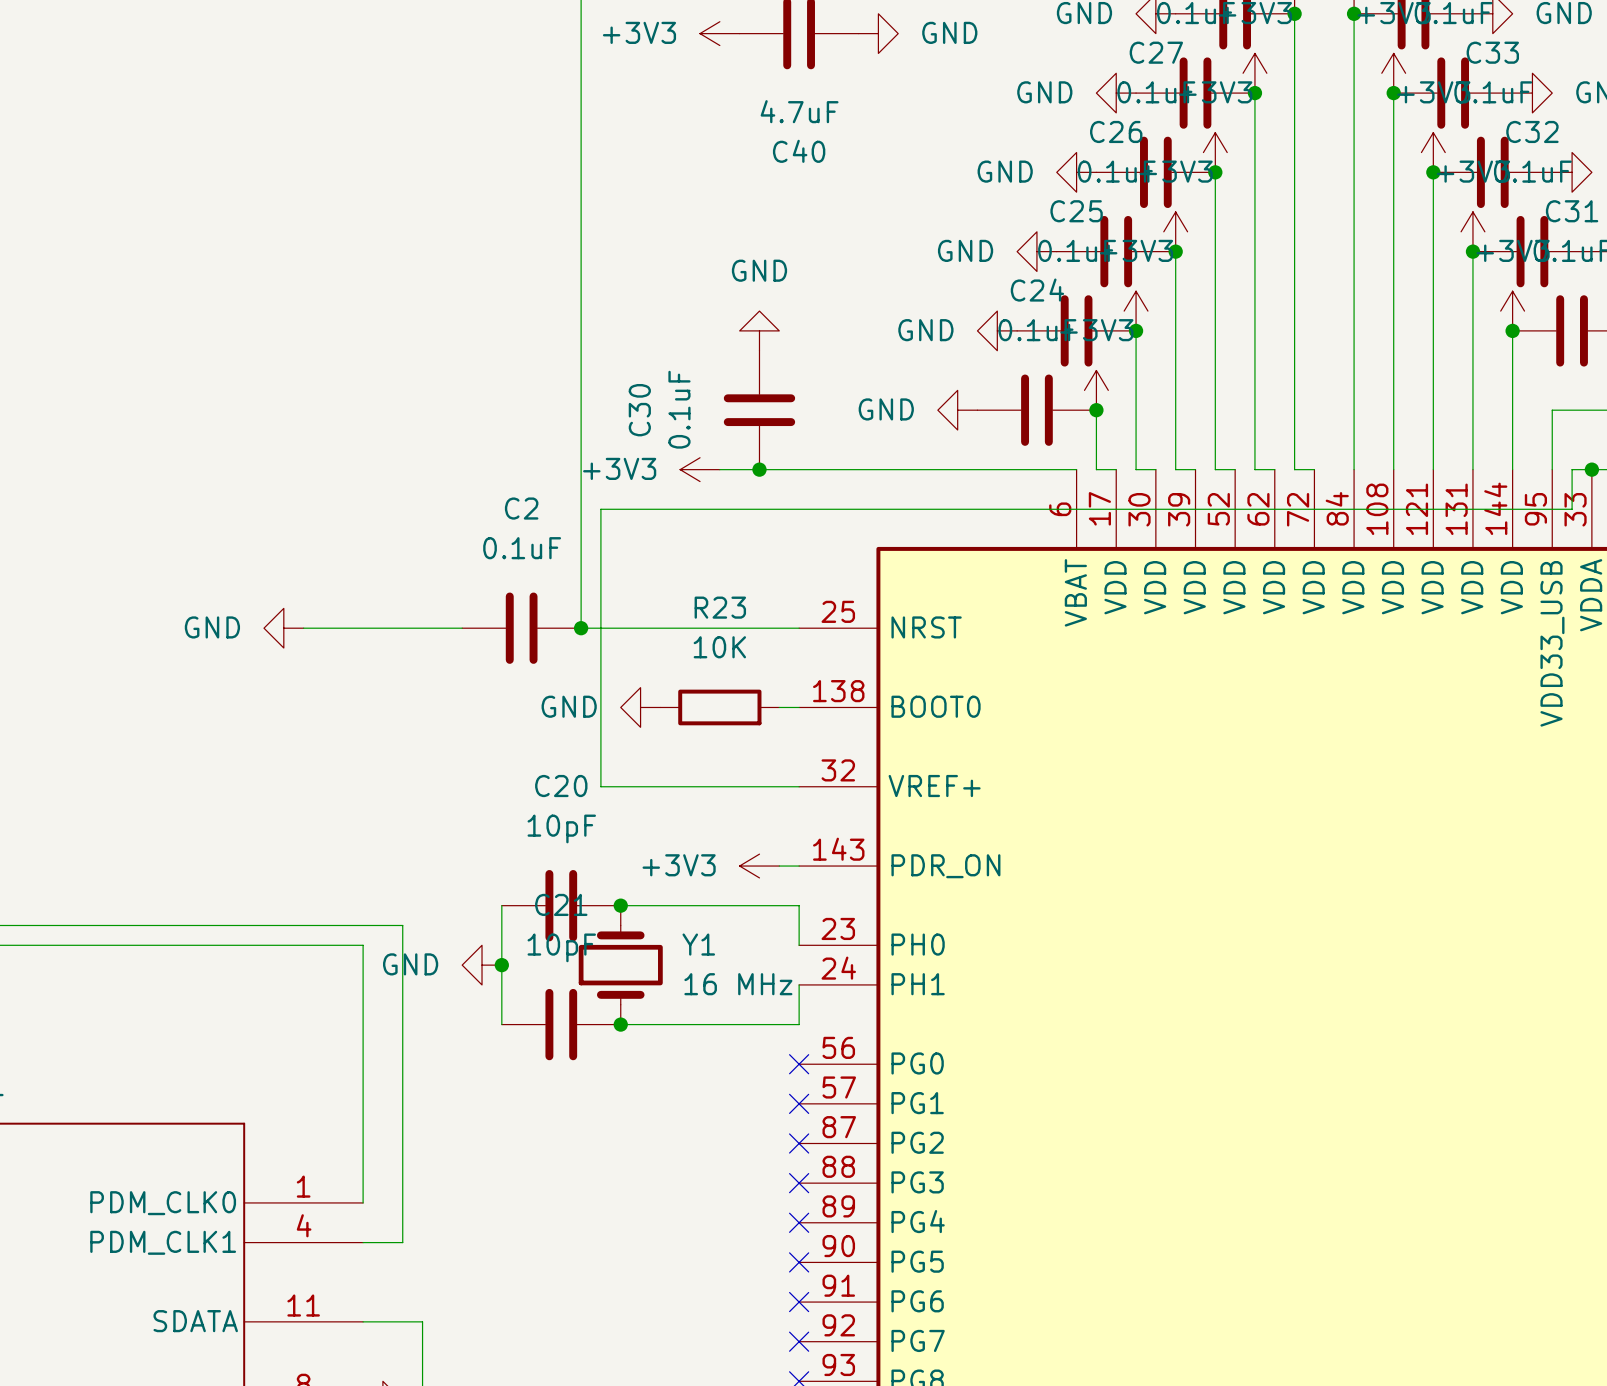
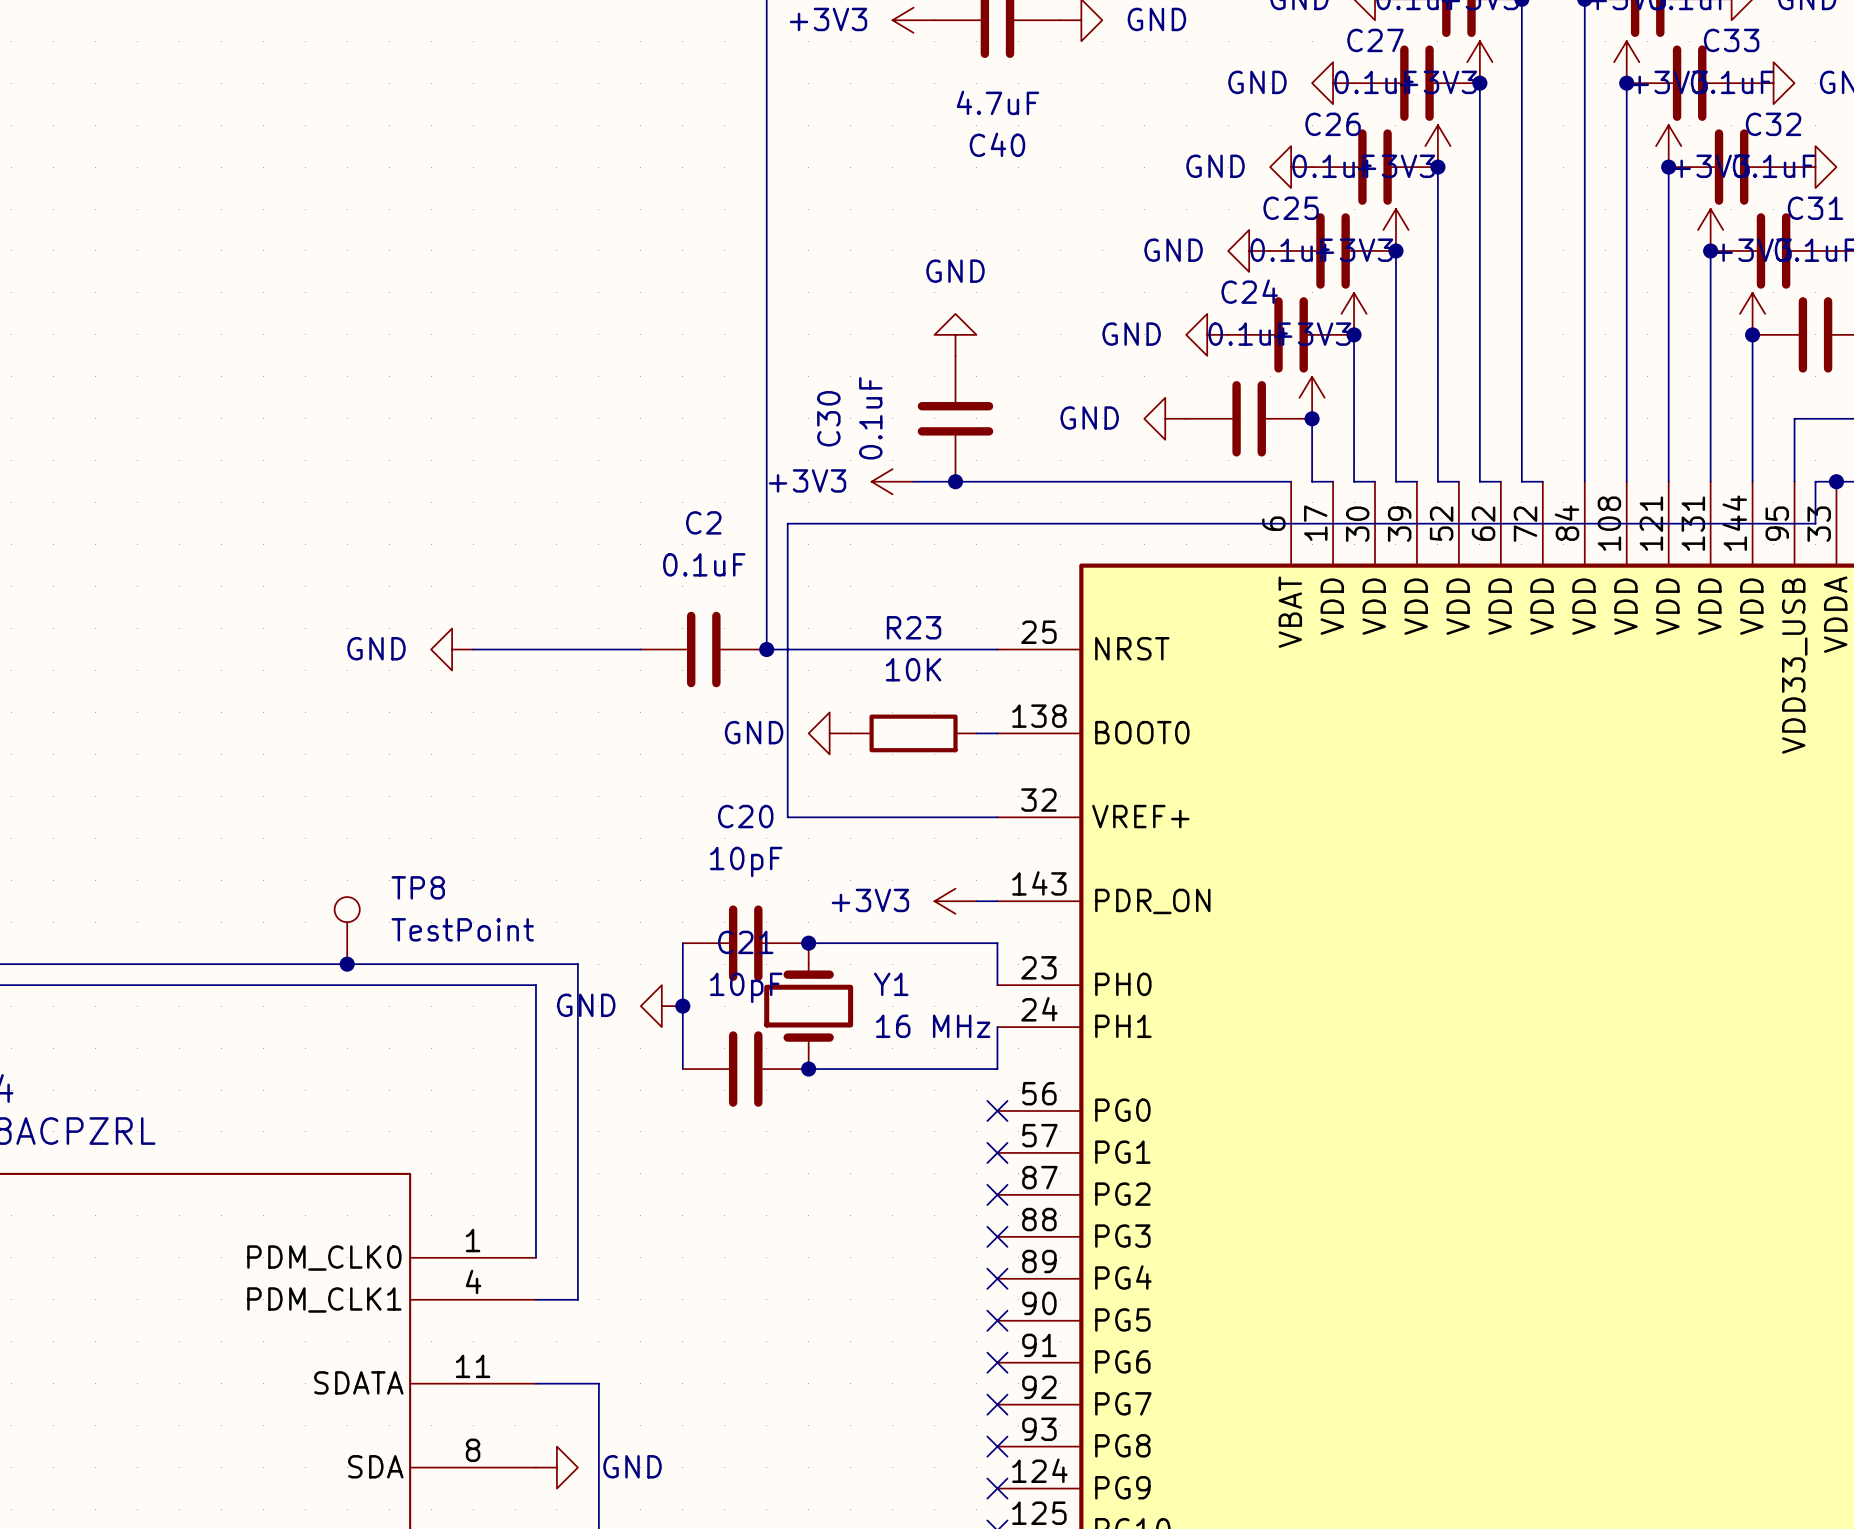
TP8: none -> TestPoint (347, 930)
junction: none -> (347, 964)

